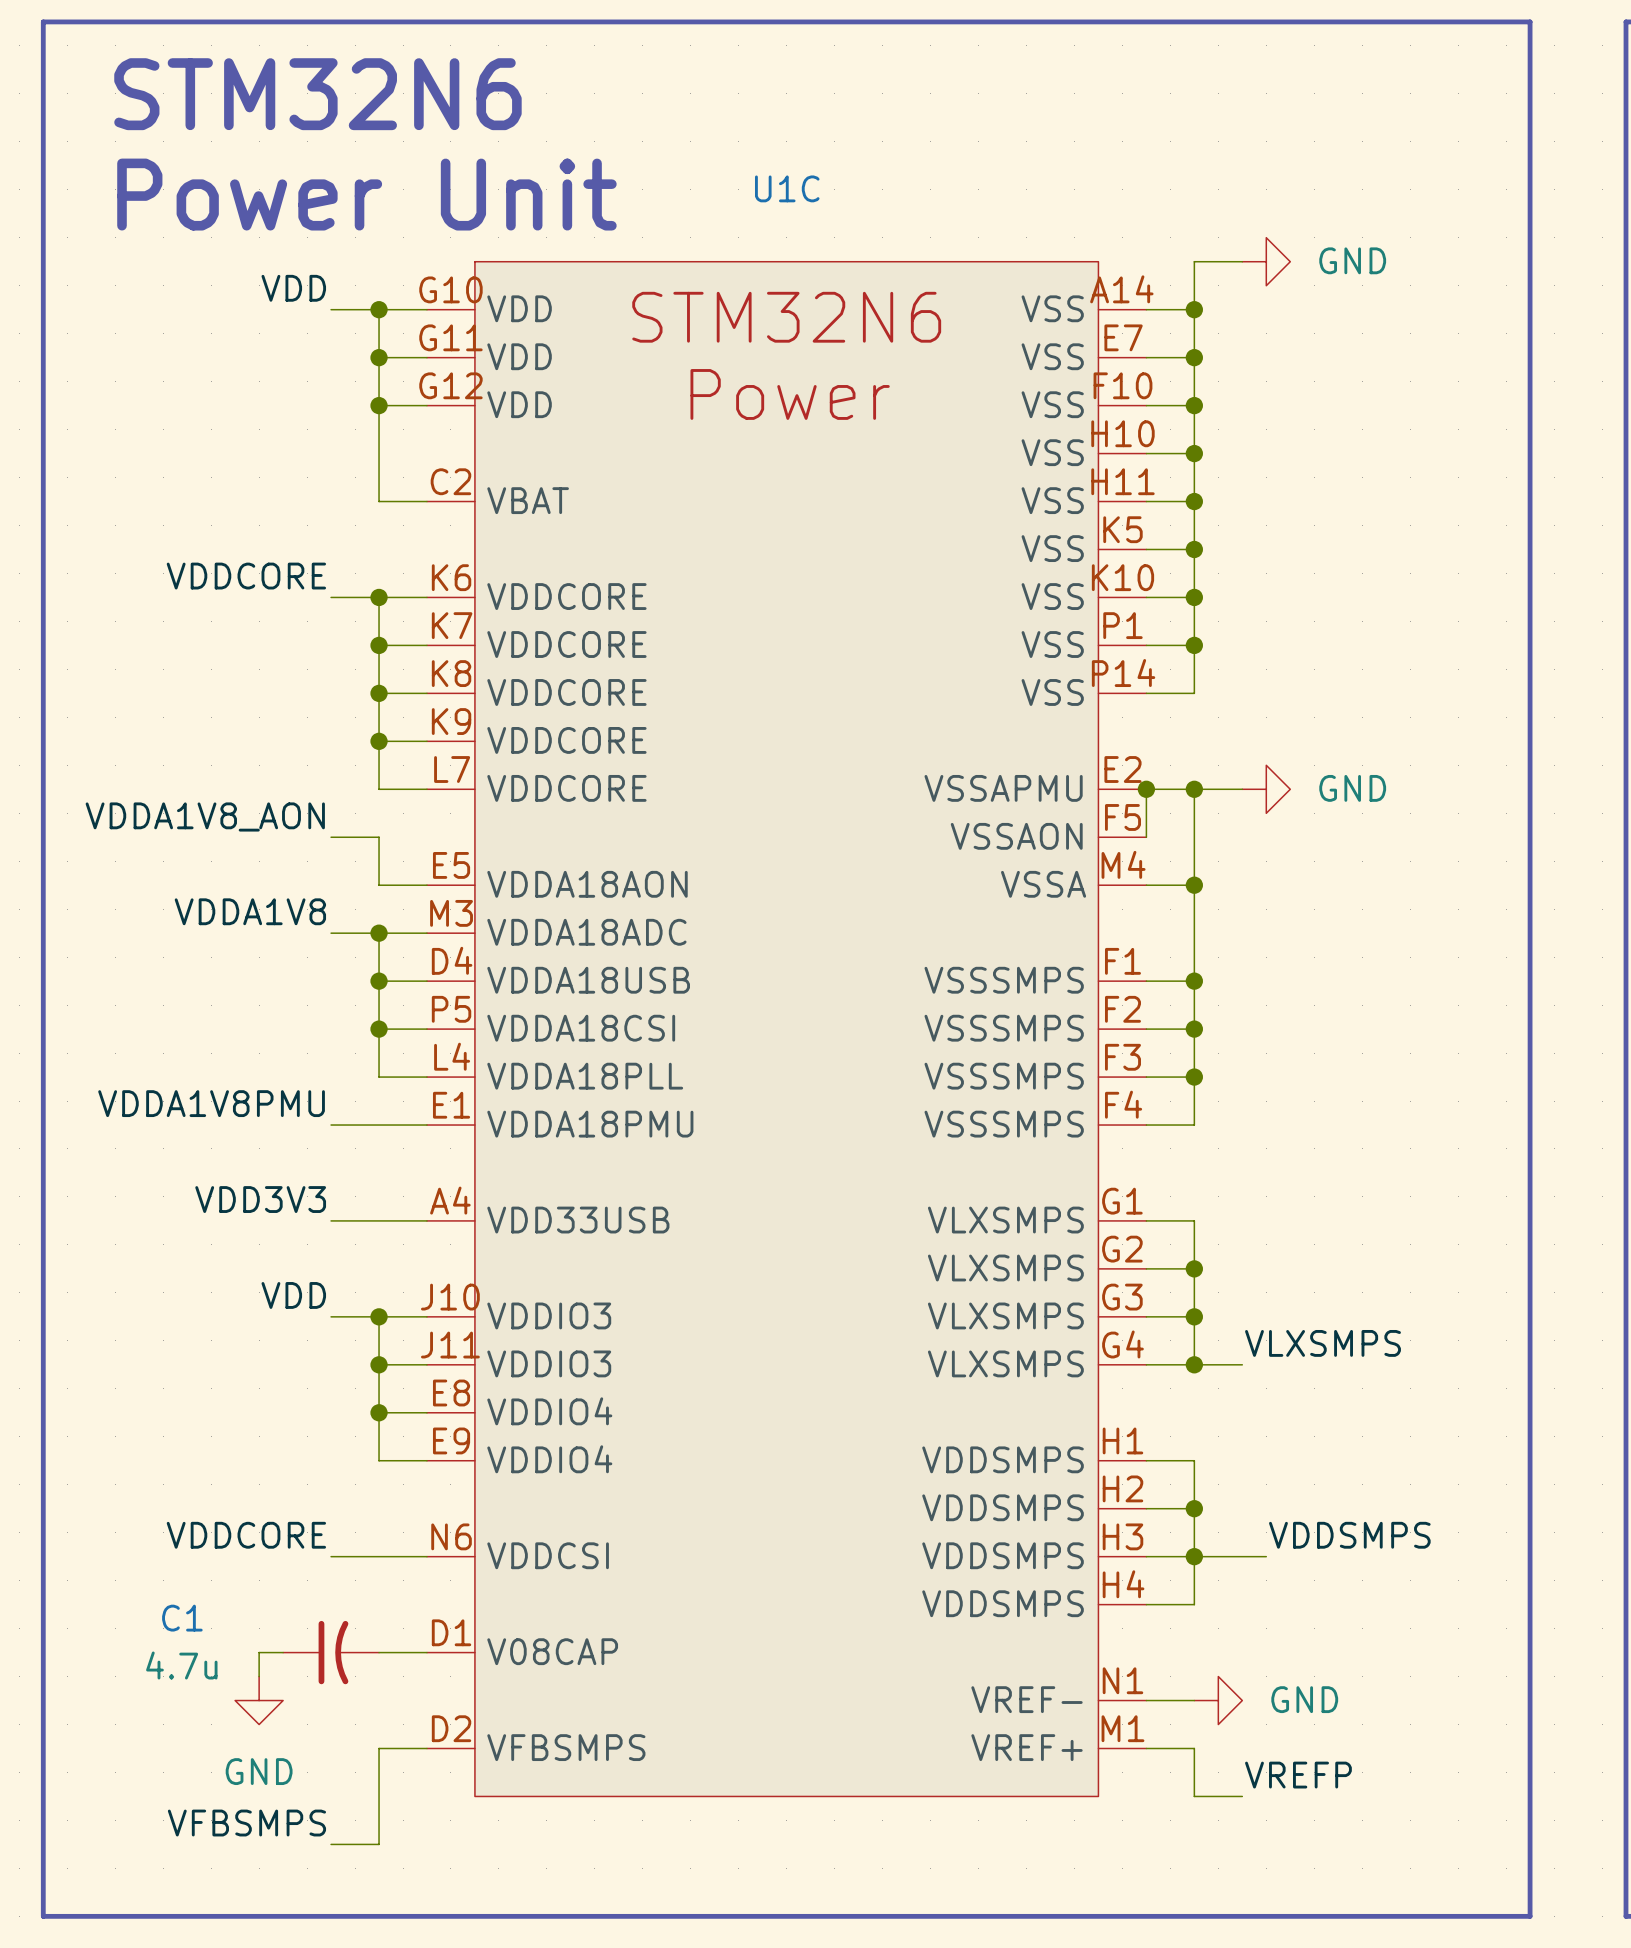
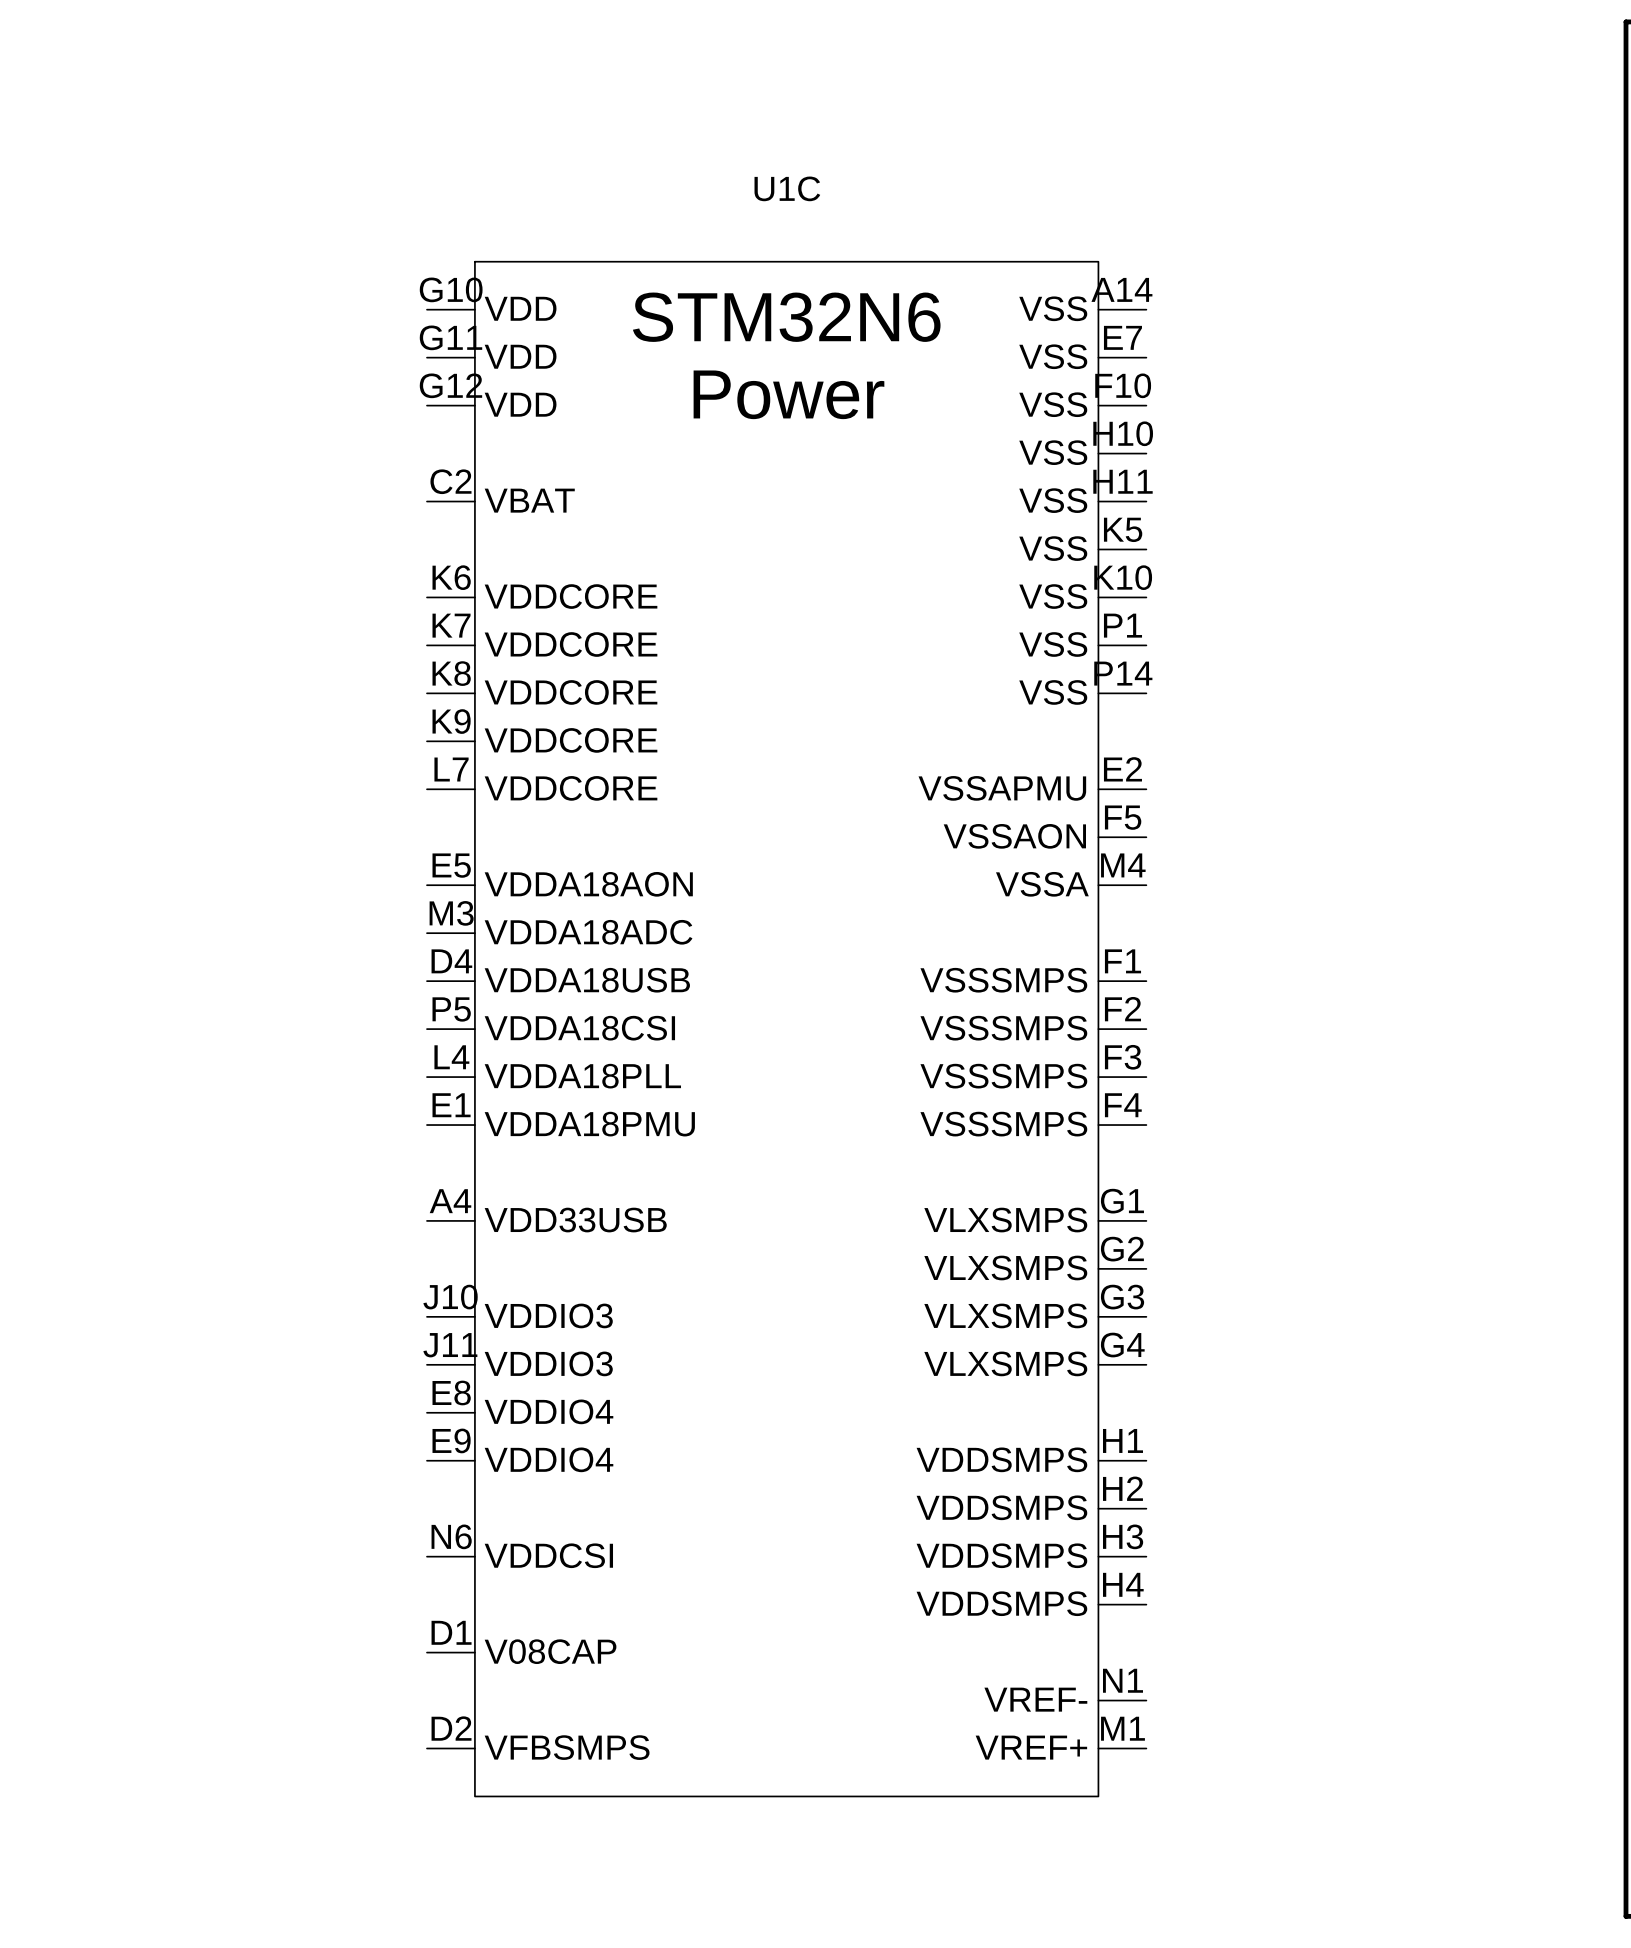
line: (43, 21) (1530, 21) (1530, 1916) (43, 1916) (43, 21) -> none
text: STM32N6 (317, 94) -> none
text: Power Unit (366, 194) -> none
wire: (1242, 261) (1194, 261) (1194, 693) (1146, 693) -> none
power symbol: GND (1266, 261) -> none
label: VDD (293, 288) -> none
wire: (331, 309) (426, 309) -> none
wire: (379, 309) (379, 501) (426, 501) -> none
junction: (379, 309) -> none
wire: (1146, 309) (1194, 309) -> none
junction: (1194, 309) -> none
wire: (379, 357) (426, 357) -> none
junction: (379, 357) -> none
wire: (1146, 357) (1194, 357) -> none
junction: (1194, 357) -> none
wire: (379, 405) (426, 405) -> none
junction: (379, 405) -> none
wire: (1146, 405) (1194, 405) -> none
junction: (1194, 405) -> none
wire: (1146, 453) (1194, 453) -> none
junction: (1194, 453) -> none
wire: (1146, 501) (1194, 501) -> none
junction: (1194, 501) -> none
wire: (1146, 549) (1194, 549) -> none
junction: (1194, 549) -> none
label: VDDCORE (246, 576) -> none
wire: (331, 597) (426, 597) -> none
wire: (379, 597) (379, 789) (426, 789) -> none
junction: (379, 597) -> none
wire: (1146, 597) (1194, 597) -> none
junction: (1194, 597) -> none
wire: (379, 645) (426, 645) -> none
junction: (379, 645) -> none
wire: (1146, 645) (1194, 645) -> none
junction: (1194, 645) -> none
wire: (379, 693) (426, 693) -> none
junction: (379, 693) -> none
wire: (379, 741) (426, 741) -> none
junction: (379, 741) -> none
junction: (1146, 789) -> none
wire: (1194, 789) (1194, 1125) (1146, 1125) -> none
junction: (1194, 789) -> none
wire: (1242, 789) (1146, 789) (1146, 837) -> none
power symbol: GND (1266, 789) -> none
label: VDDA1V8_AON (205, 816) -> none
wire: (331, 837) (379, 837) (379, 885) (426, 885) -> none
wire: (1146, 885) (1194, 885) -> none
junction: (1194, 885) -> none
label: VDDA1V8 (250, 911) -> none
wire: (331, 933) (426, 933) -> none
wire: (379, 933) (379, 1077) (426, 1077) -> none
junction: (379, 933) -> none
wire: (379, 981) (426, 981) -> none
junction: (379, 981) -> none
wire: (1146, 981) (1194, 981) -> none
junction: (1194, 981) -> none
wire: (379, 1029) (426, 1029) -> none
junction: (379, 1029) -> none
wire: (1146, 1029) (1194, 1029) -> none
junction: (1194, 1029) -> none
wire: (1146, 1077) (1194, 1077) -> none
junction: (1194, 1077) -> none
label: VDDA1V8PMU (211, 1103) -> none
wire: (331, 1125) (426, 1125) -> none
label: VDD3V3 (260, 1199) -> none
wire: (331, 1220) (426, 1220) -> none
wire: (1146, 1220) (1194, 1220) (1194, 1364) -> none
wire: (1146, 1268) (1194, 1268) -> none
junction: (1194, 1268) -> none
label: VDD (293, 1295) -> none
wire: (331, 1316) (426, 1316) -> none
wire: (379, 1316) (379, 1460) (426, 1460) -> none
junction: (379, 1316) -> none
wire: (1146, 1316) (1194, 1316) -> none
junction: (1194, 1316) -> none
label: VLXSMPS (1323, 1343) -> none
wire: (379, 1364) (426, 1364) -> none
junction: (379, 1364) -> none
wire: (1146, 1364) (1242, 1364) -> none
junction: (1194, 1364) -> none
wire: (379, 1412) (426, 1412) -> none
junction: (379, 1412) -> none
wire: (1146, 1460) (1194, 1460) (1194, 1604) (1146, 1604) -> none
wire: (1146, 1508) (1194, 1508) -> none
junction: (1194, 1508) -> none
label: VDDCORE (246, 1535) -> none
label: VDDSMPS (1349, 1535) -> none
wire: (331, 1556) (426, 1556) -> none
wire: (1146, 1556) (1266, 1556) -> none
junction: (1194, 1556) -> none
wire: (283, 1652) (259, 1652) (259, 1676) -> none
C1: 4.7u (331, 1652) -> none
wire: (379, 1652) (426, 1652) -> none
power symbol: GND (259, 1700) -> none
wire: (1146, 1700) (1194, 1700) -> none
power symbol: GND (1218, 1700) -> none
wire: (426, 1748) (379, 1748) (379, 1844) (331, 1844) -> none
wire: (1146, 1748) (1194, 1748) (1194, 1796) (1242, 1796) -> none
label: VREFP (1298, 1775) -> none
label: VFBSMPS (246, 1823) -> none

